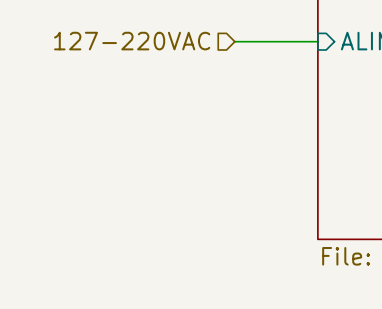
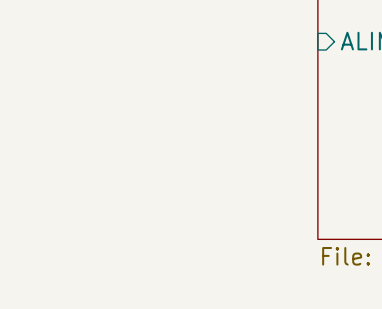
hierarchical label: 127-220VAC (132, 41) -> none
wire: (234, 41) (317, 41) -> none

